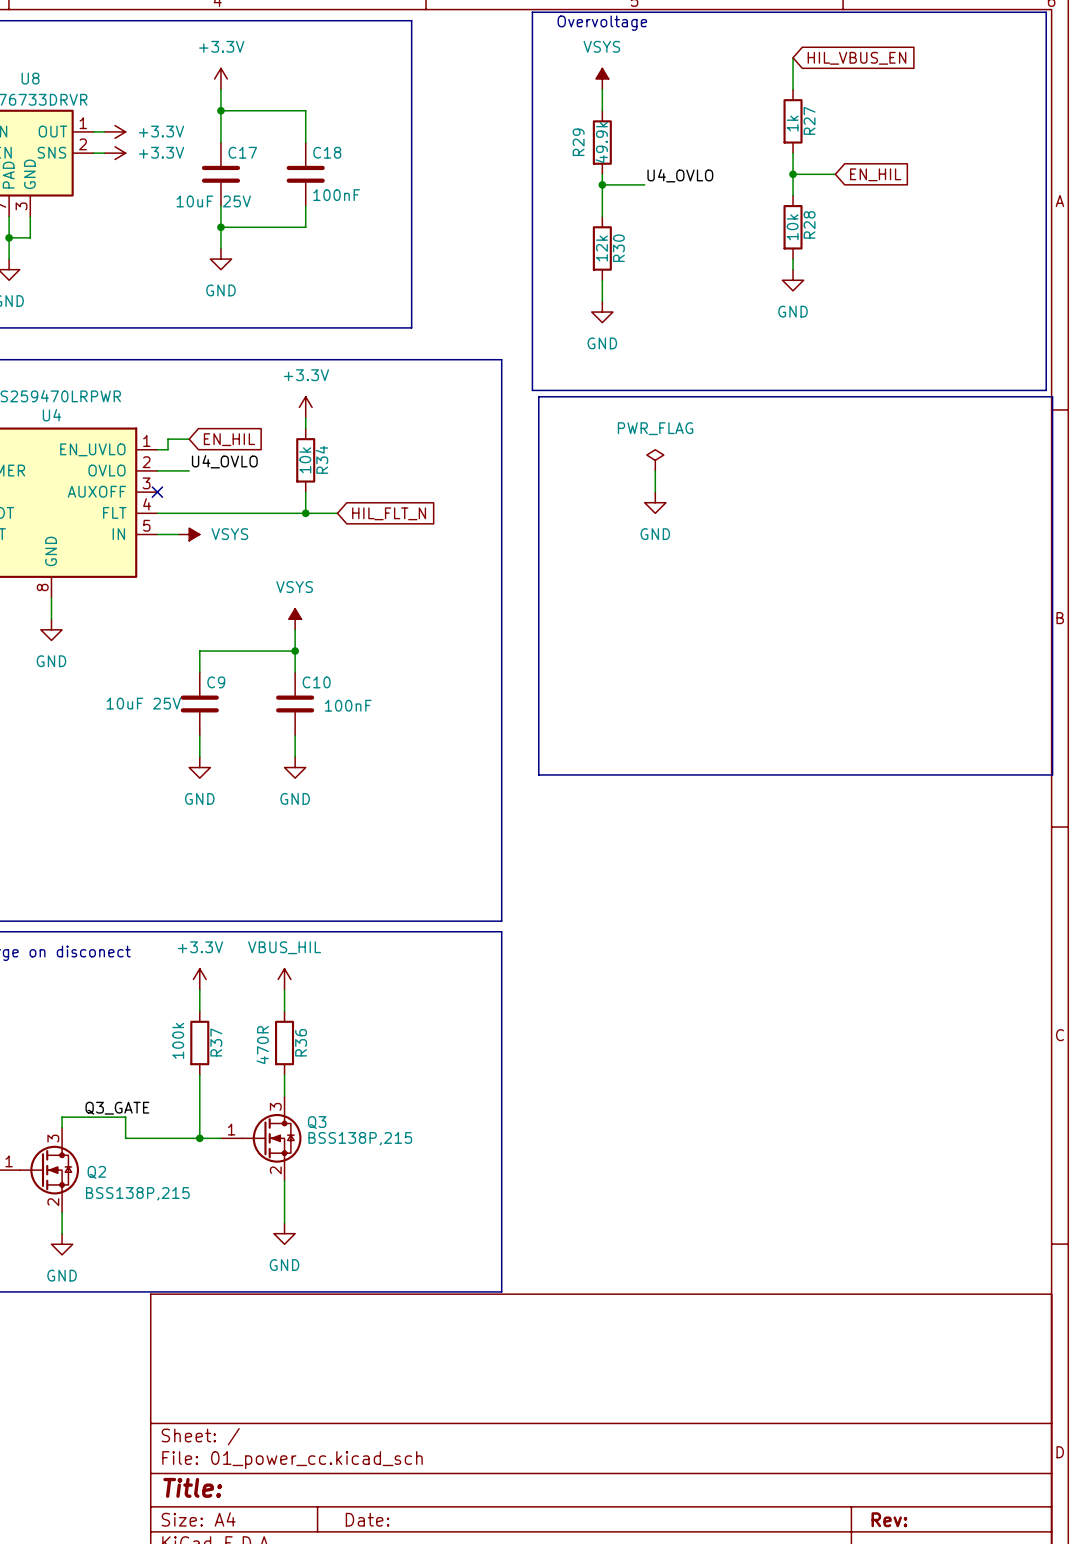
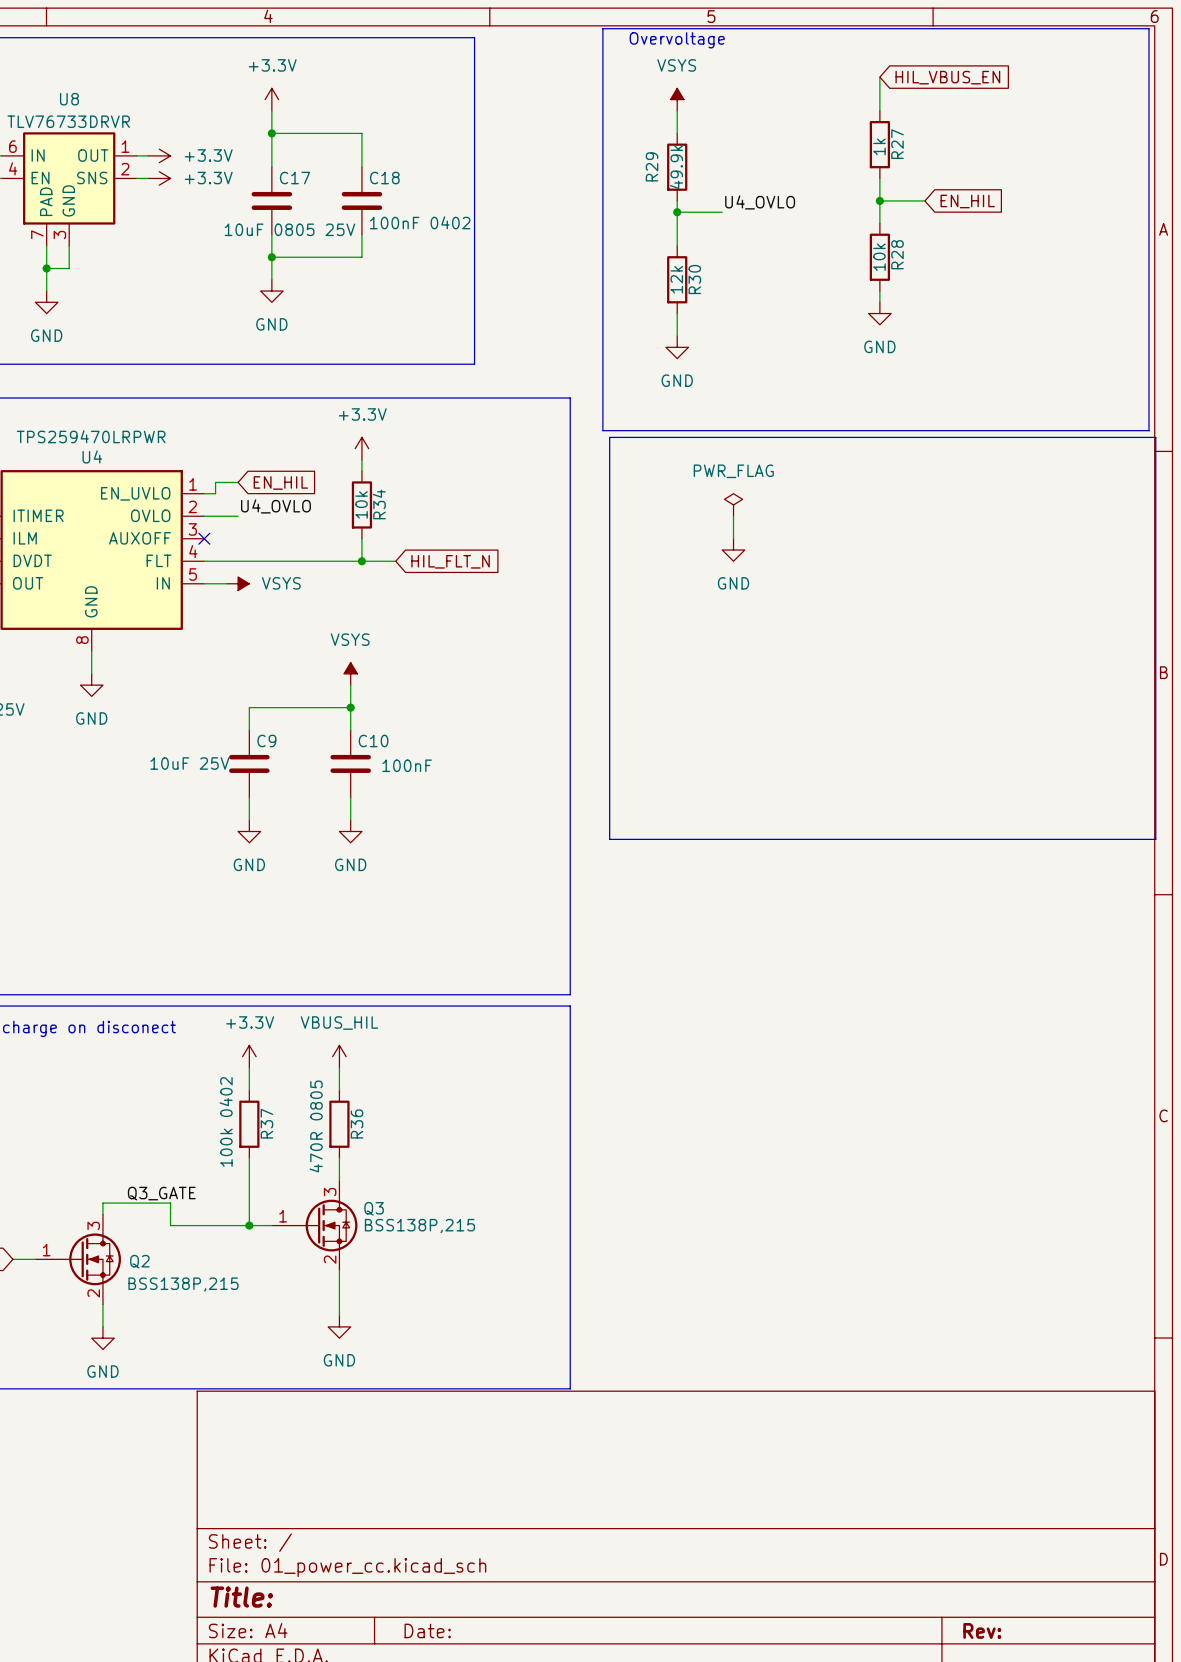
C18 value: 100nF (336, 195) -> 100nF 0402 (420, 222)
C17 value: 10uF 25V (213, 201) -> 10uF 0805 25V (289, 229)
R37 value: 100k (178, 1040) -> 100k 0402 (226, 1121)
R36 value: 470R (262, 1045) -> 470R 0805 (316, 1126)

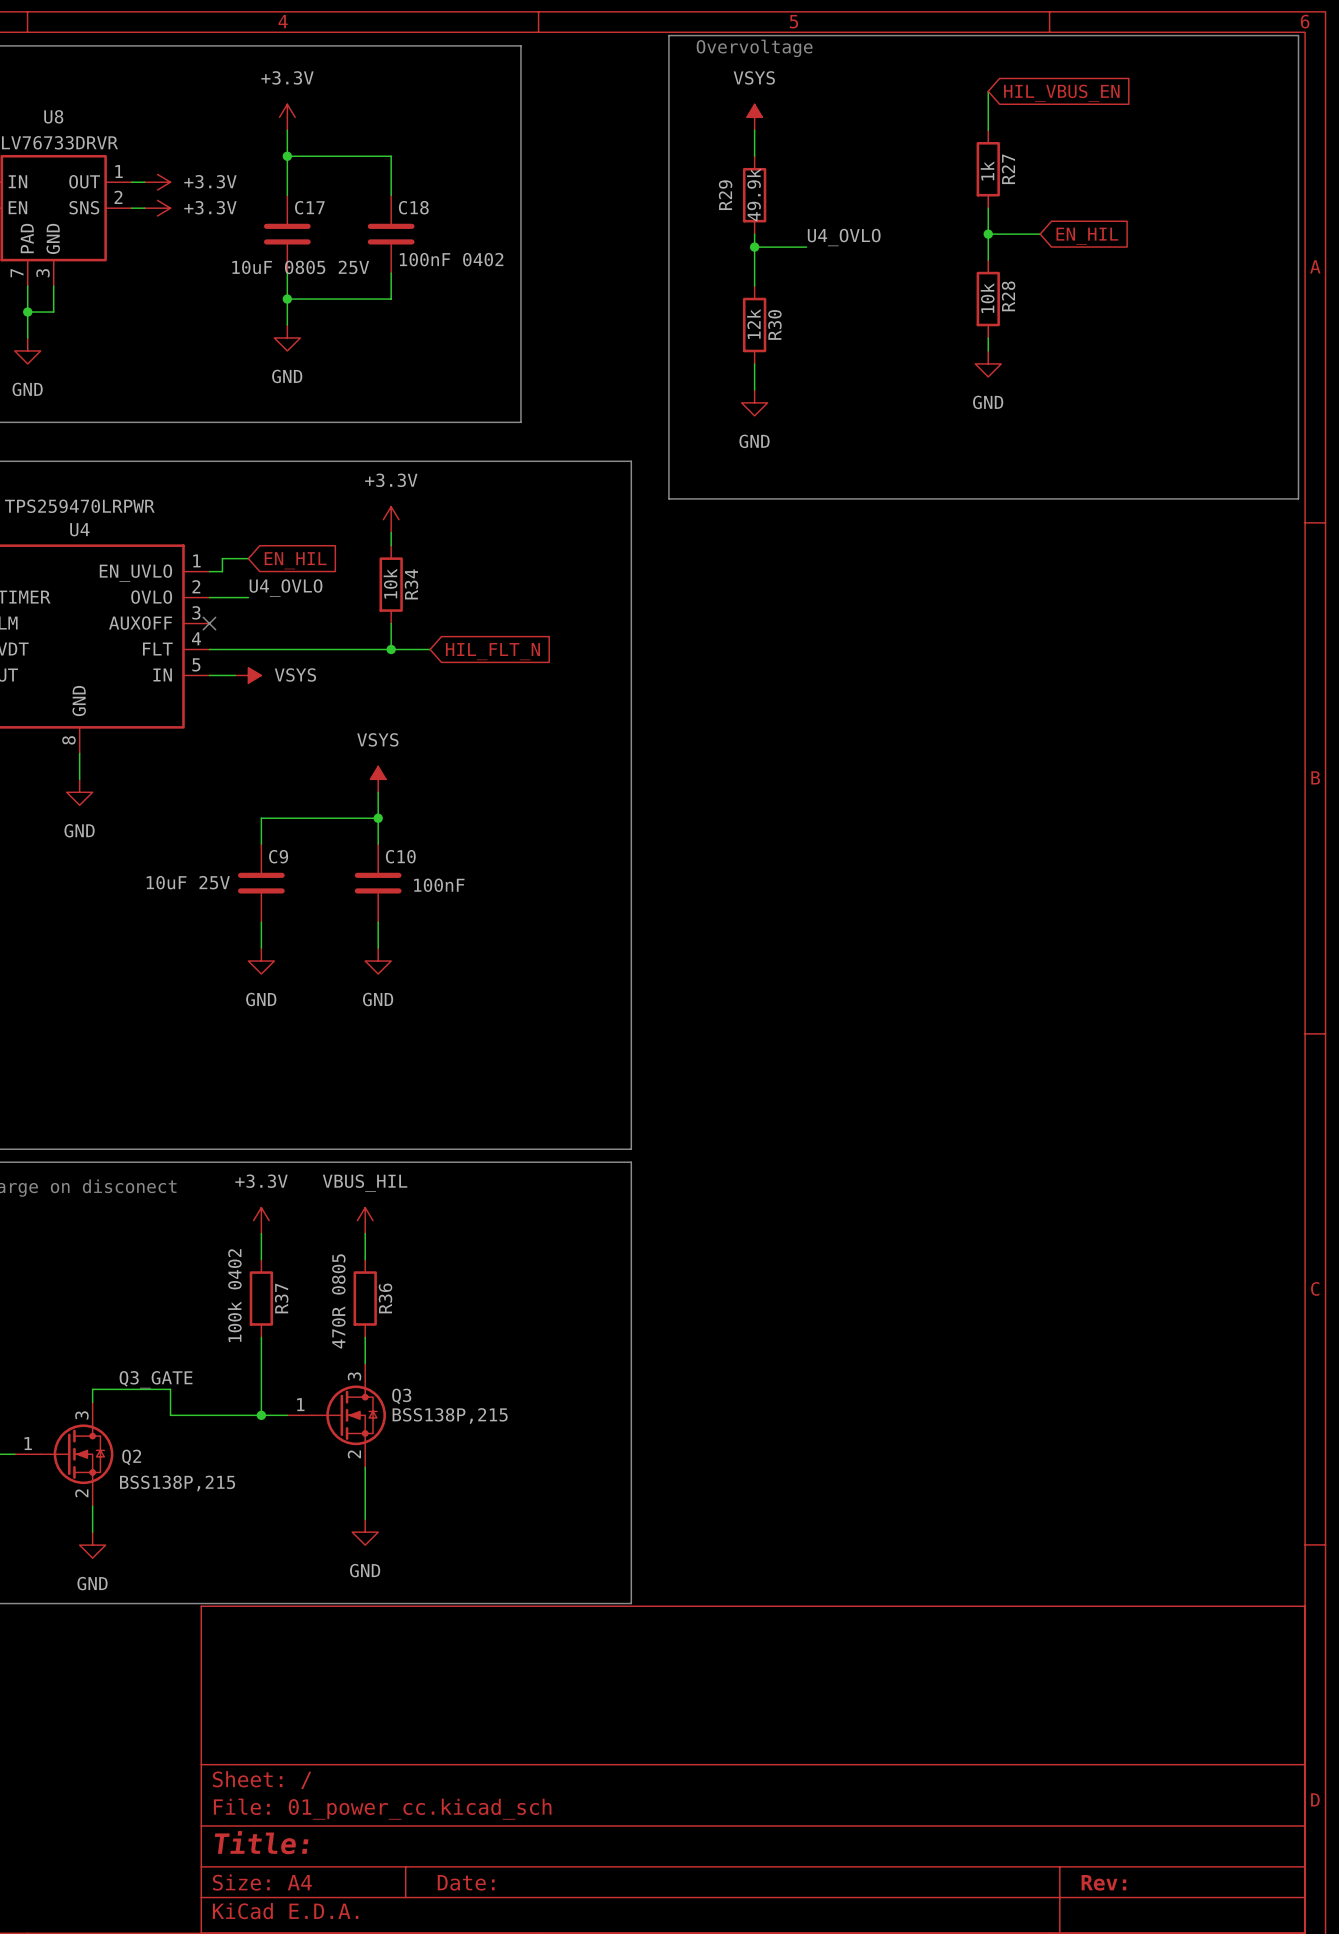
line: (609, 437) (1155, 437) (1155, 839) (609, 839) (609, 437) -> none
power symbol: PWR_FLAG (733, 504) -> none
wire: (733, 516) (733, 538) -> none
power symbol: GND (733, 550) -> none

